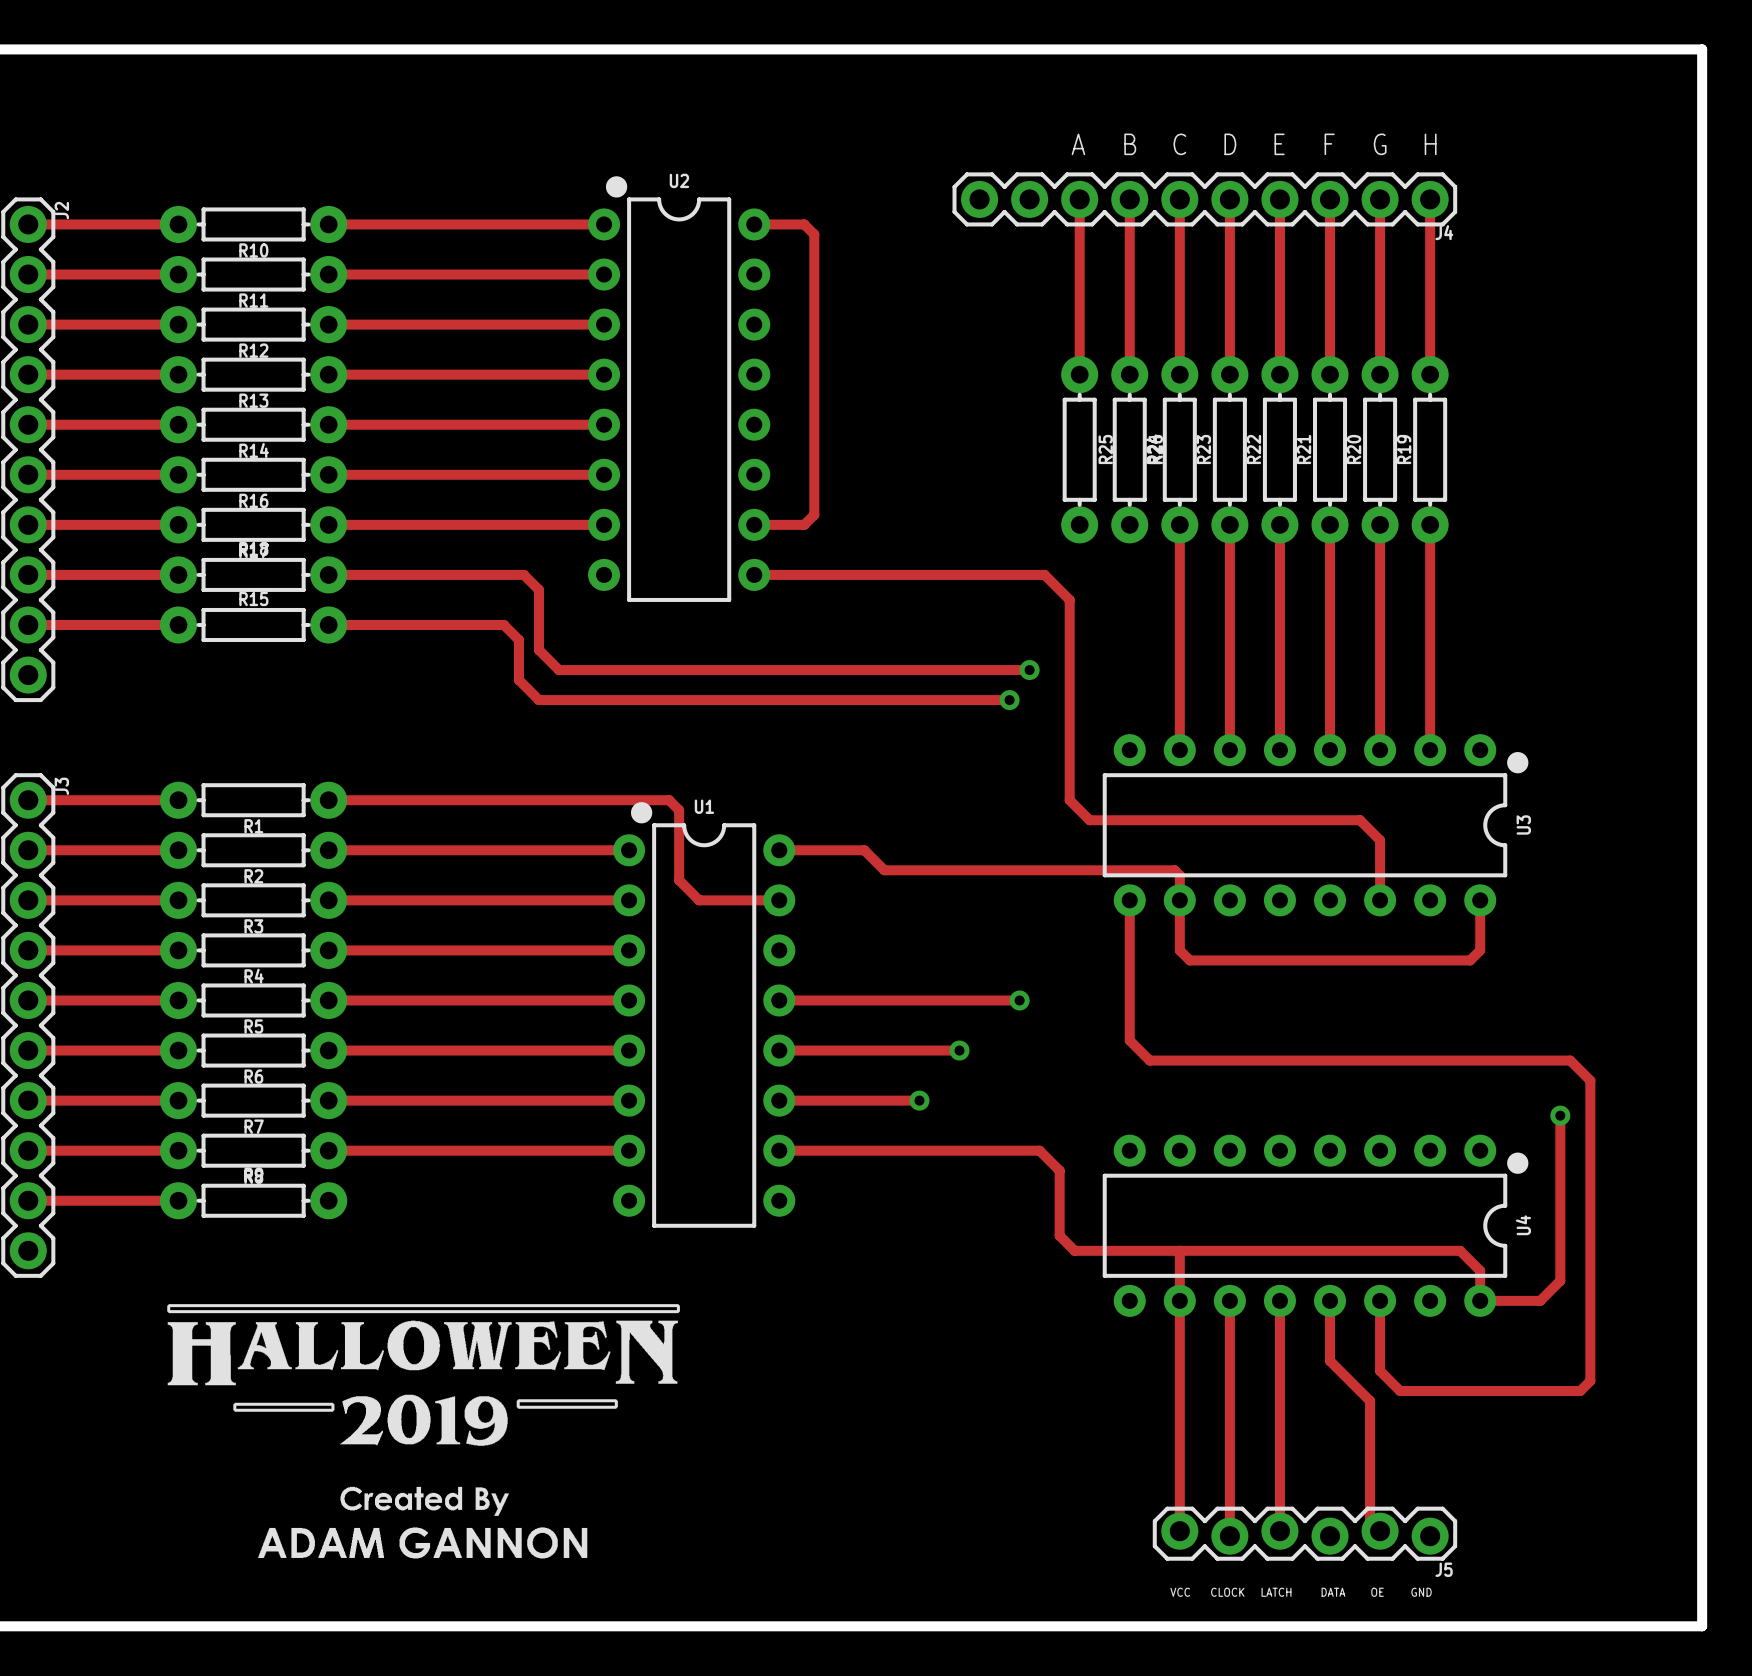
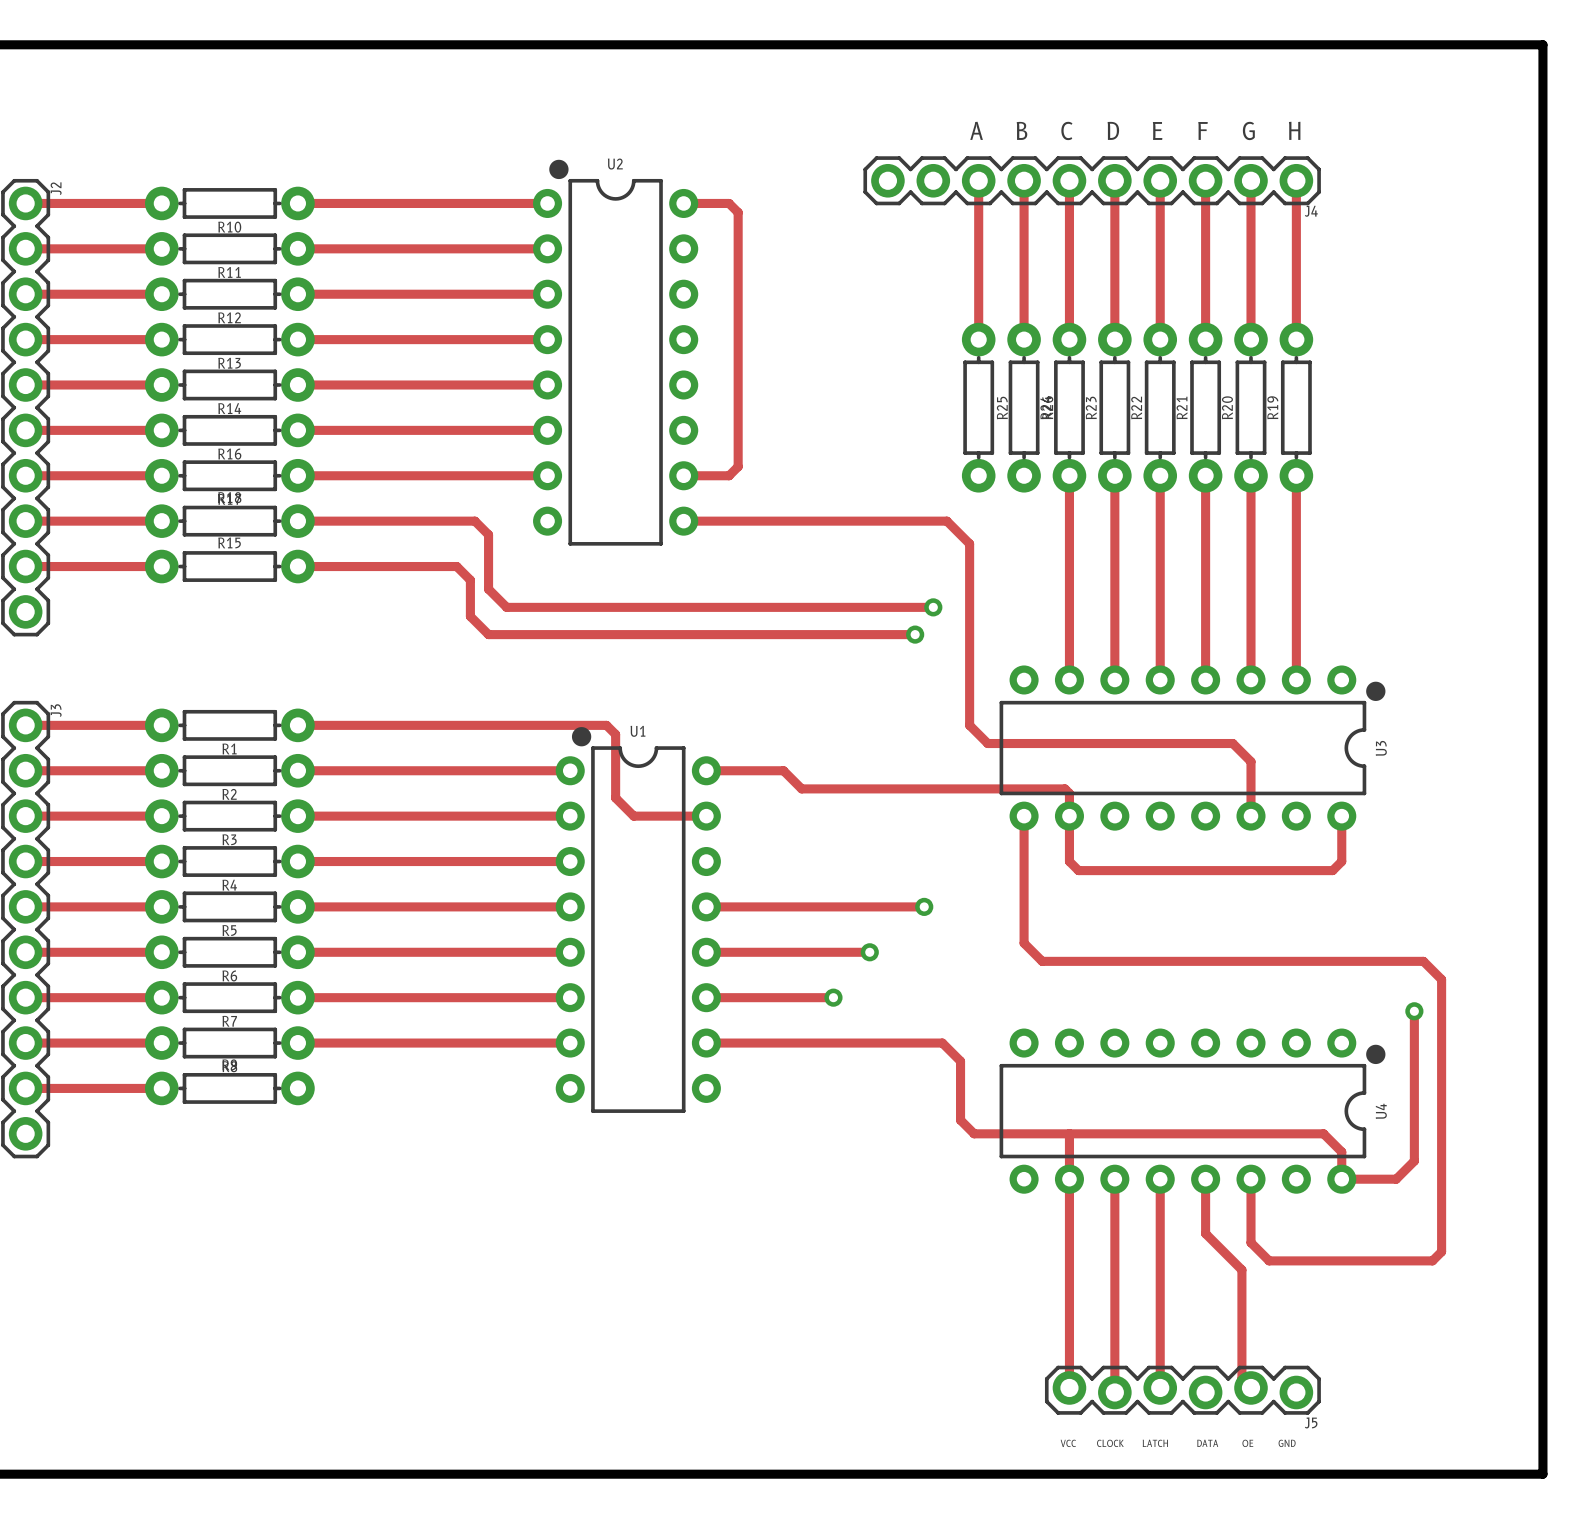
drawing: [167, 1304, 680, 1446] -> none
drawing: [257, 1486, 588, 1559] -> none

